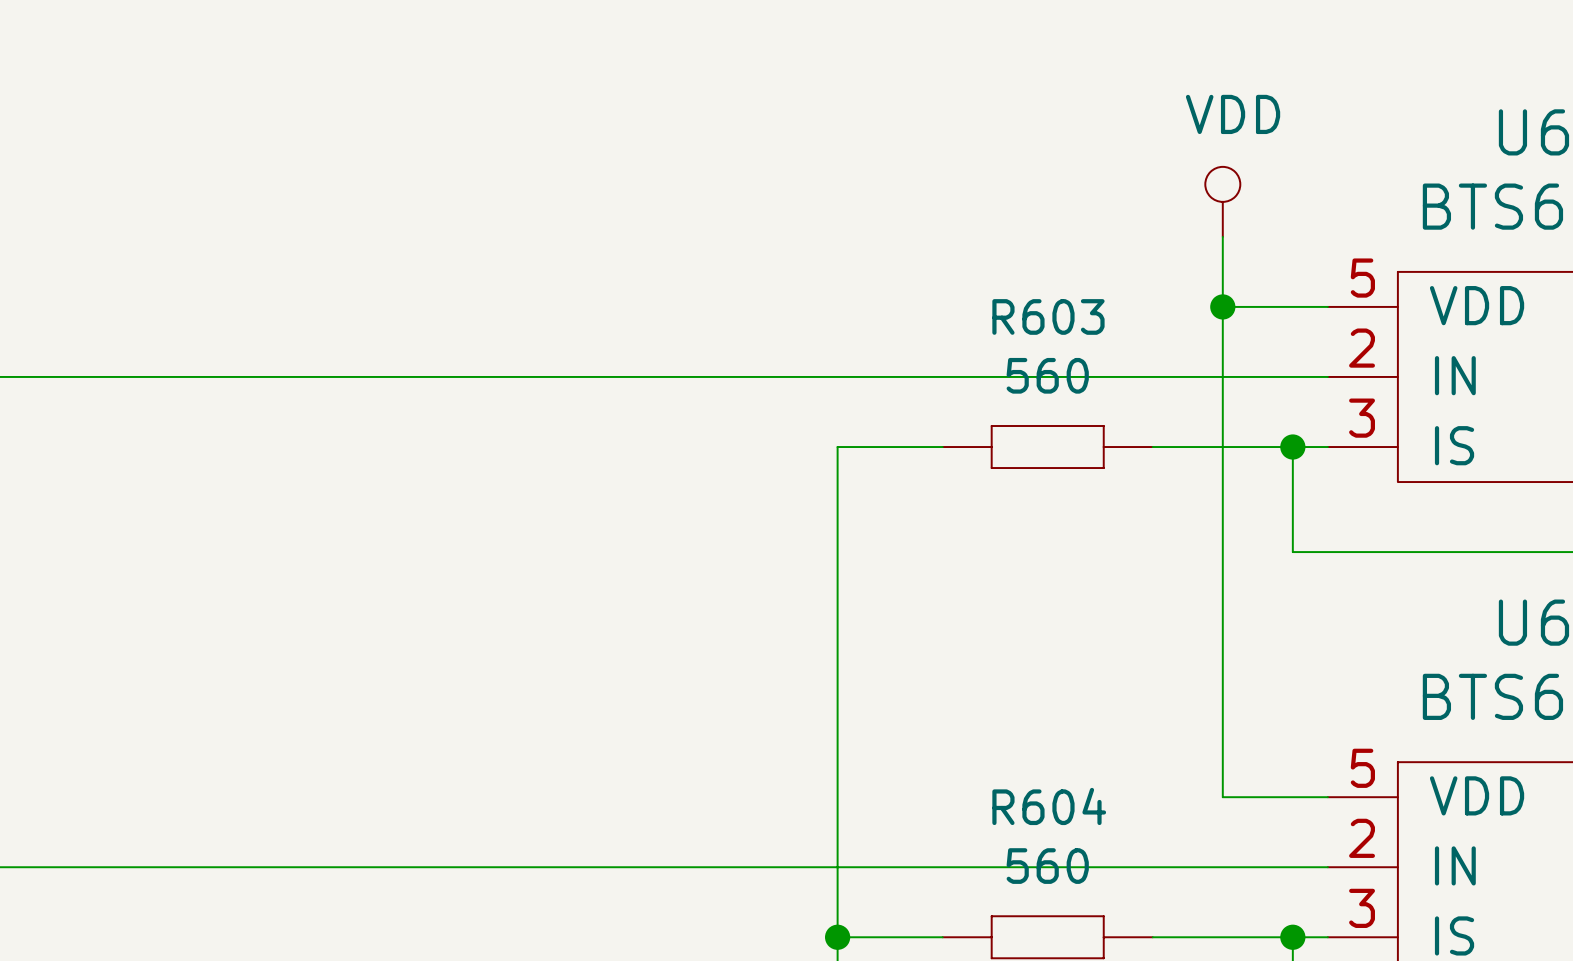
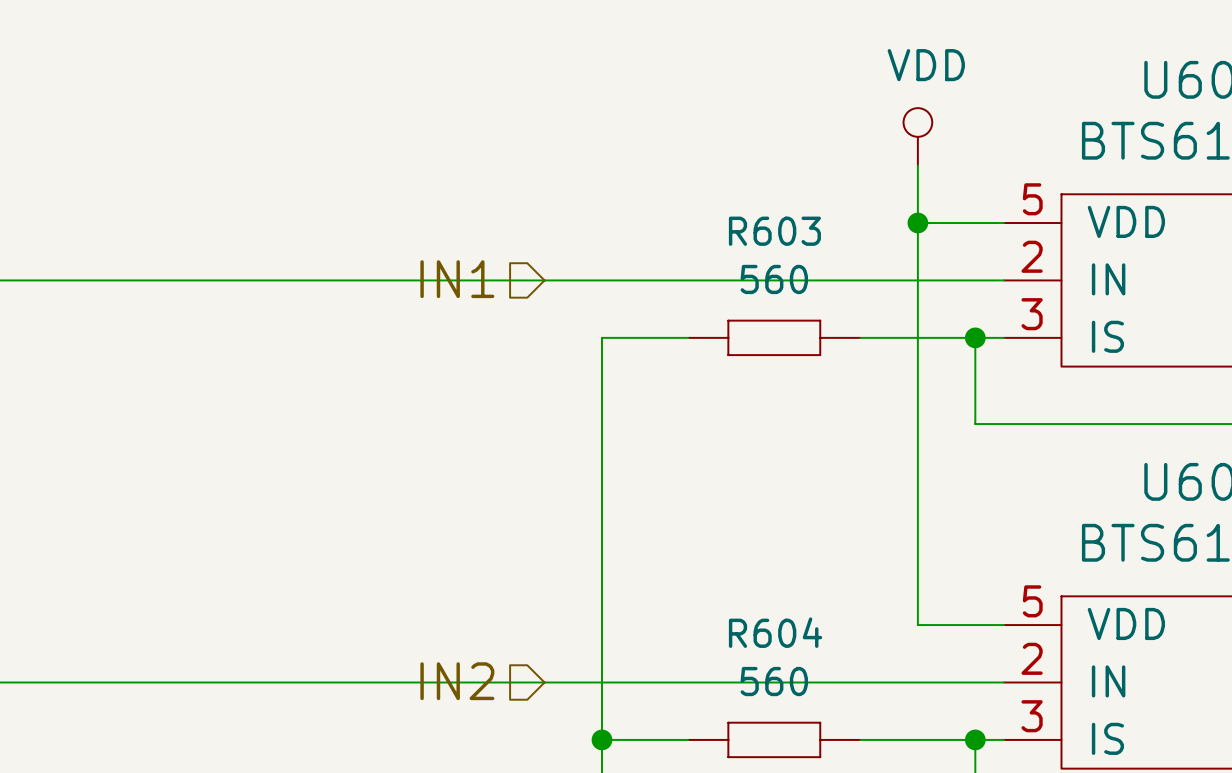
hierarchical label: none -> IN1 (457, 279)
hierarchical label: none -> IN2 (457, 681)

